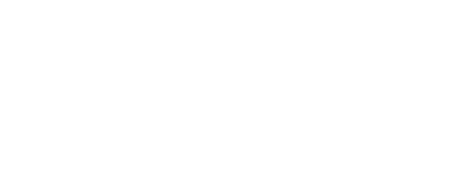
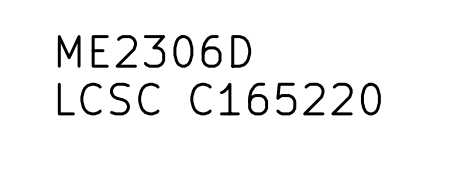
text: none -> ME2306D (154, 51)
text: none -> LCSC C165220 (219, 99)

